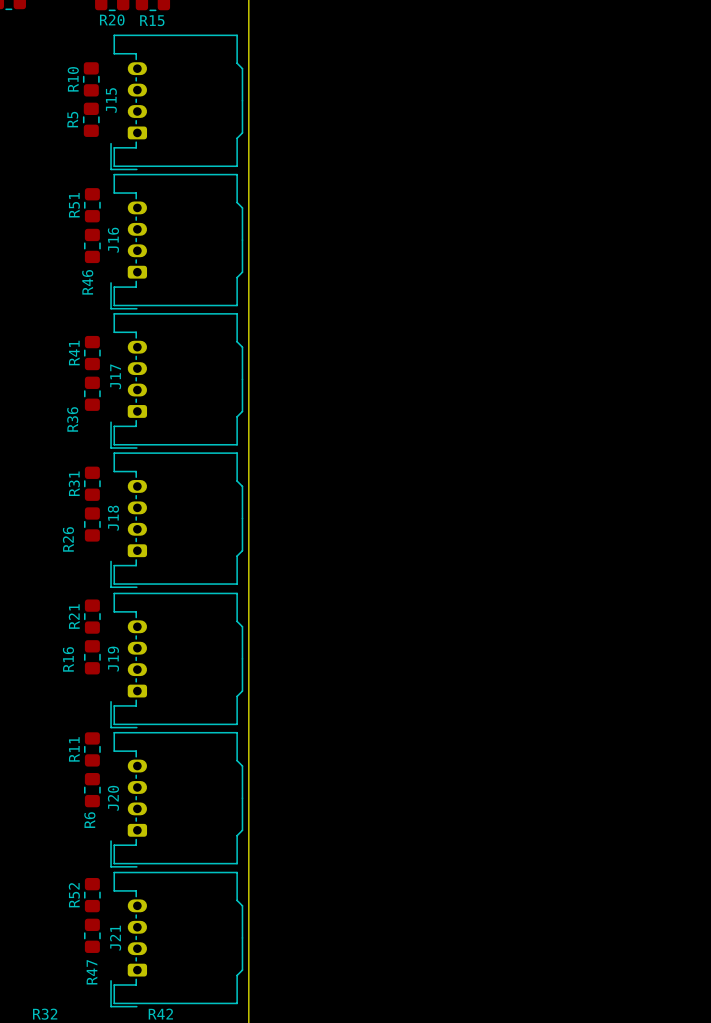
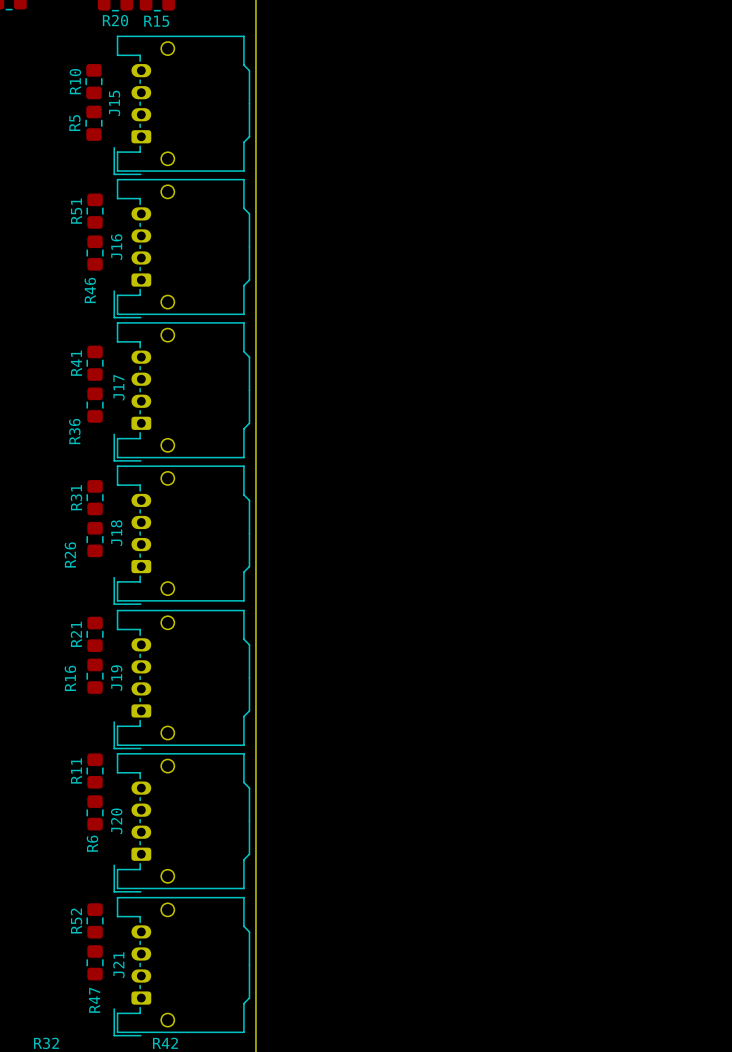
J15 footprint: [110, 34, 244, 171] -> [113, 35, 251, 176]
J16 footprint: [110, 173, 244, 310] -> [113, 178, 251, 319]
J17 footprint: [110, 313, 244, 449] -> [113, 322, 251, 462]
J18 footprint: [110, 452, 244, 588] -> [113, 465, 251, 605]
J19 footprint: [110, 592, 244, 729] -> [113, 609, 251, 750]
J20 footprint: [110, 732, 244, 868] -> [113, 753, 251, 893]
J21 footprint: [110, 871, 244, 1008] -> [113, 896, 251, 1037]

